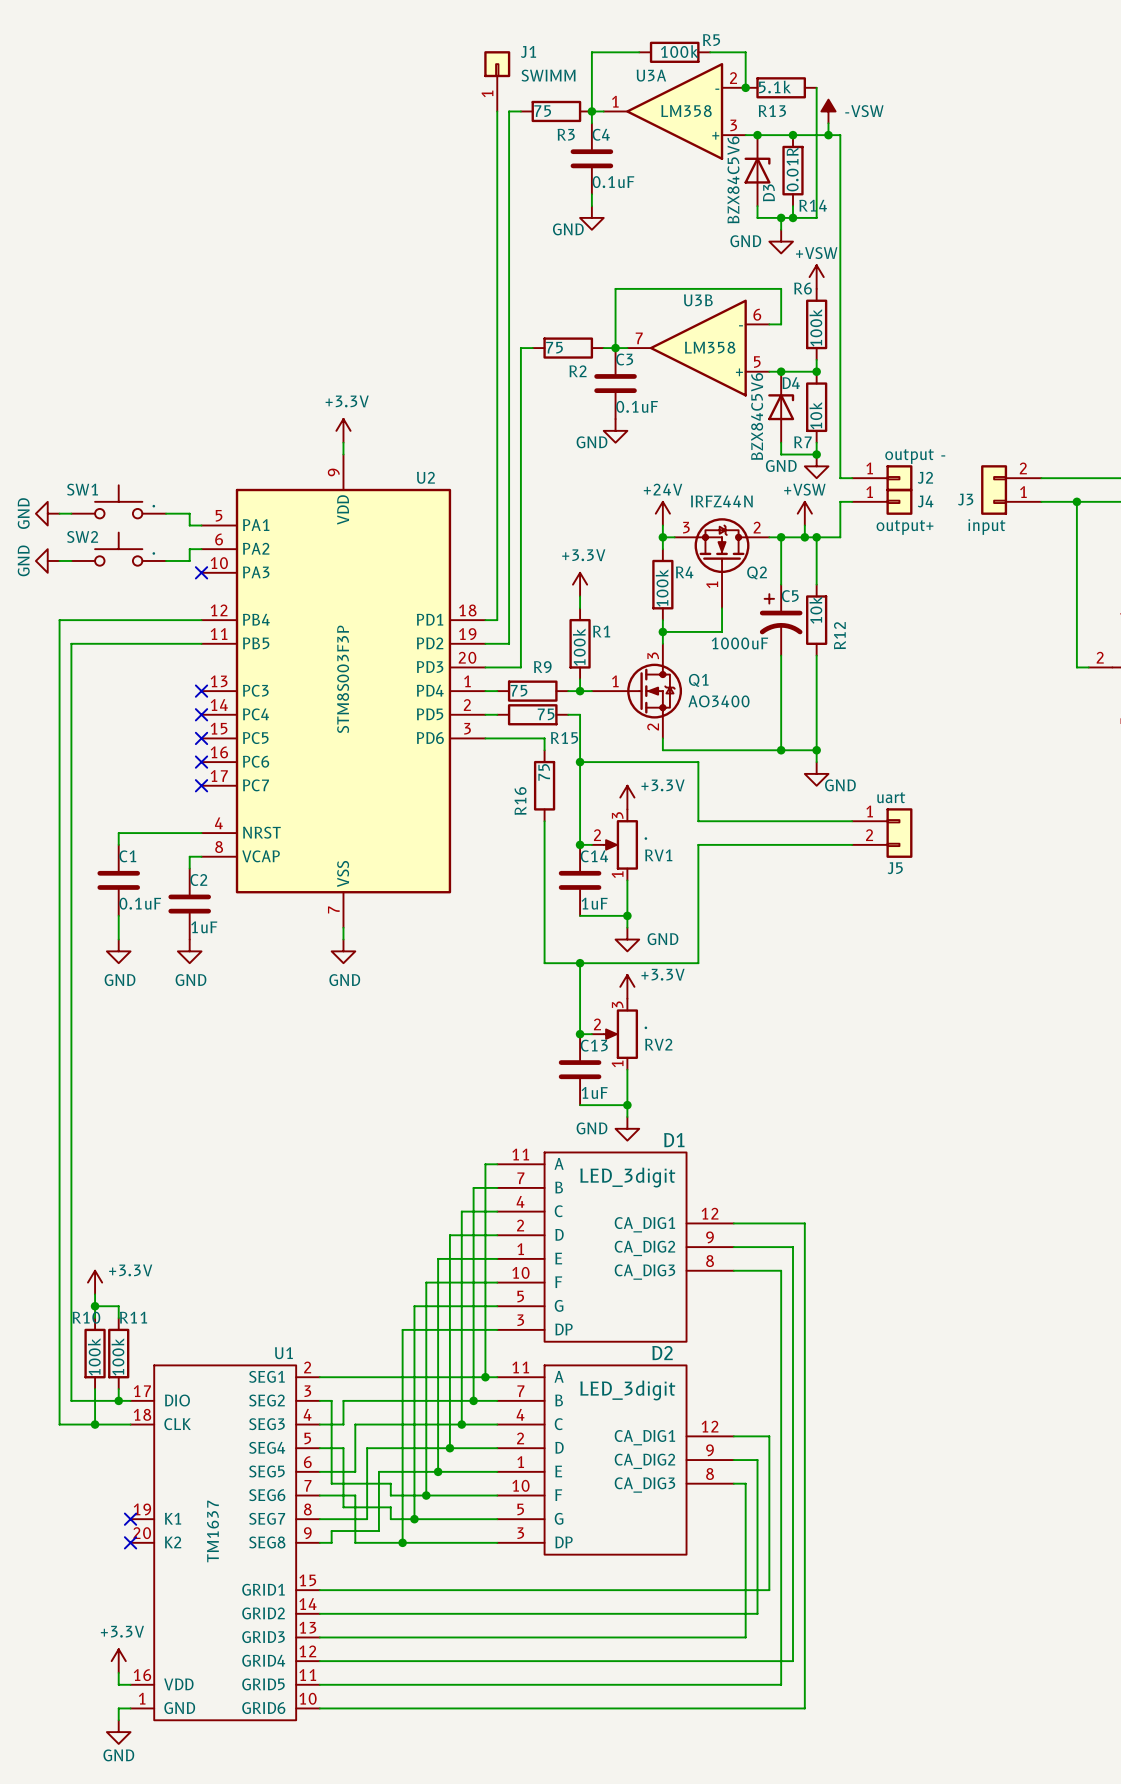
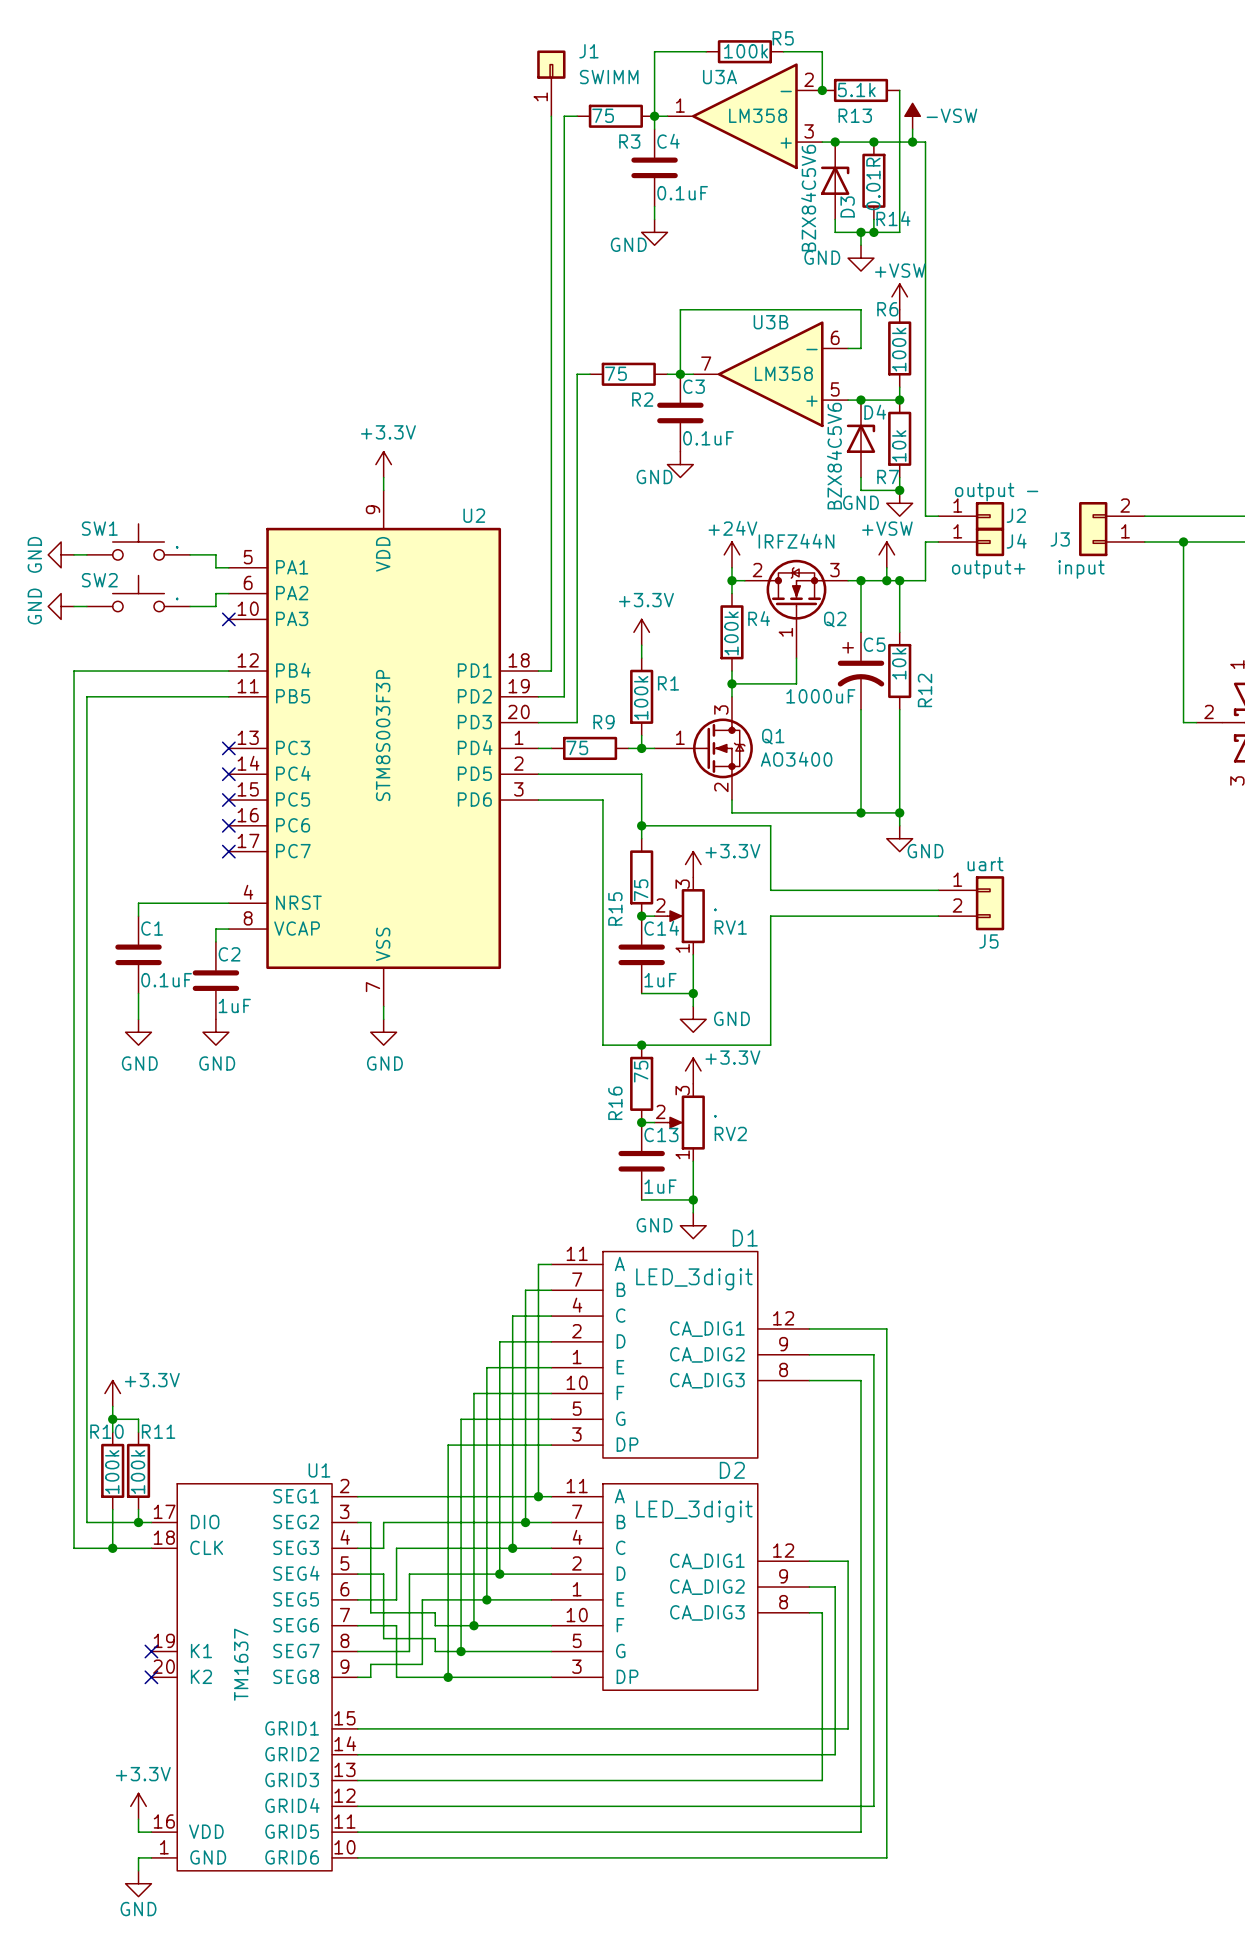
Q2 flip: as is (722, 545) -> left-right (796, 589)
wire: none -> (551, 774) (628, 774)
R15 rotation: 0° (532, 714) -> 90° clockwise (641, 877)
R15 position: (532, 714) -> (641, 877)
wire: (580, 773) (580, 844) -> (602, 812) (602, 890)
R16 position: (544, 785) -> (641, 1083)
wire: (580, 963) (580, 1034) -> none

